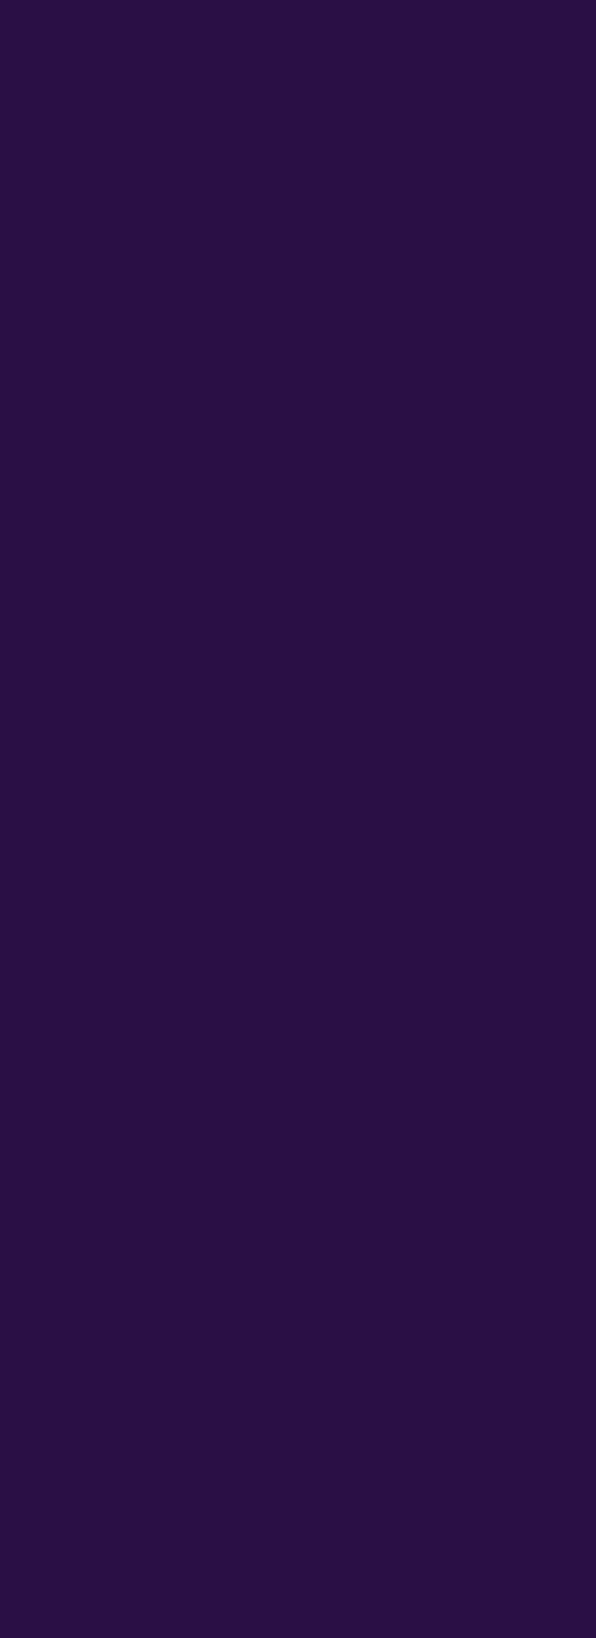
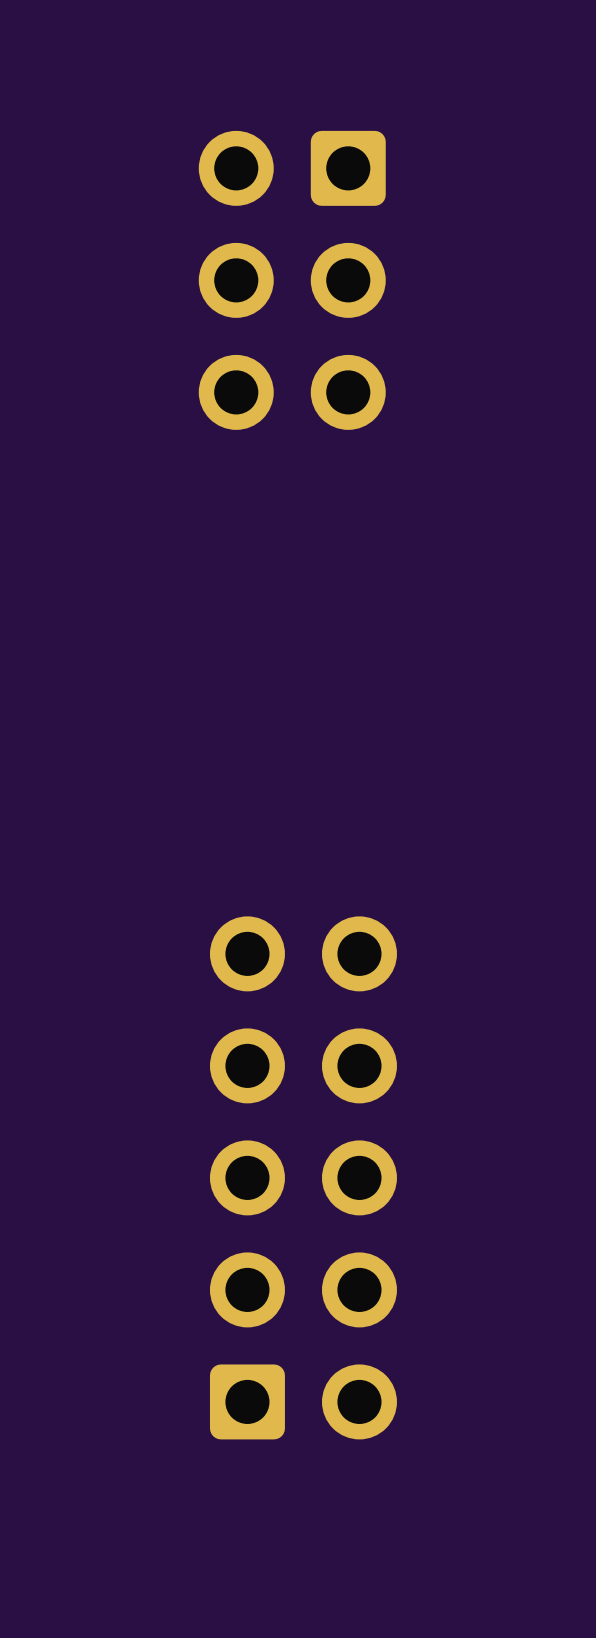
part: none -> (292, 280)
part: none -> (303, 1177)

